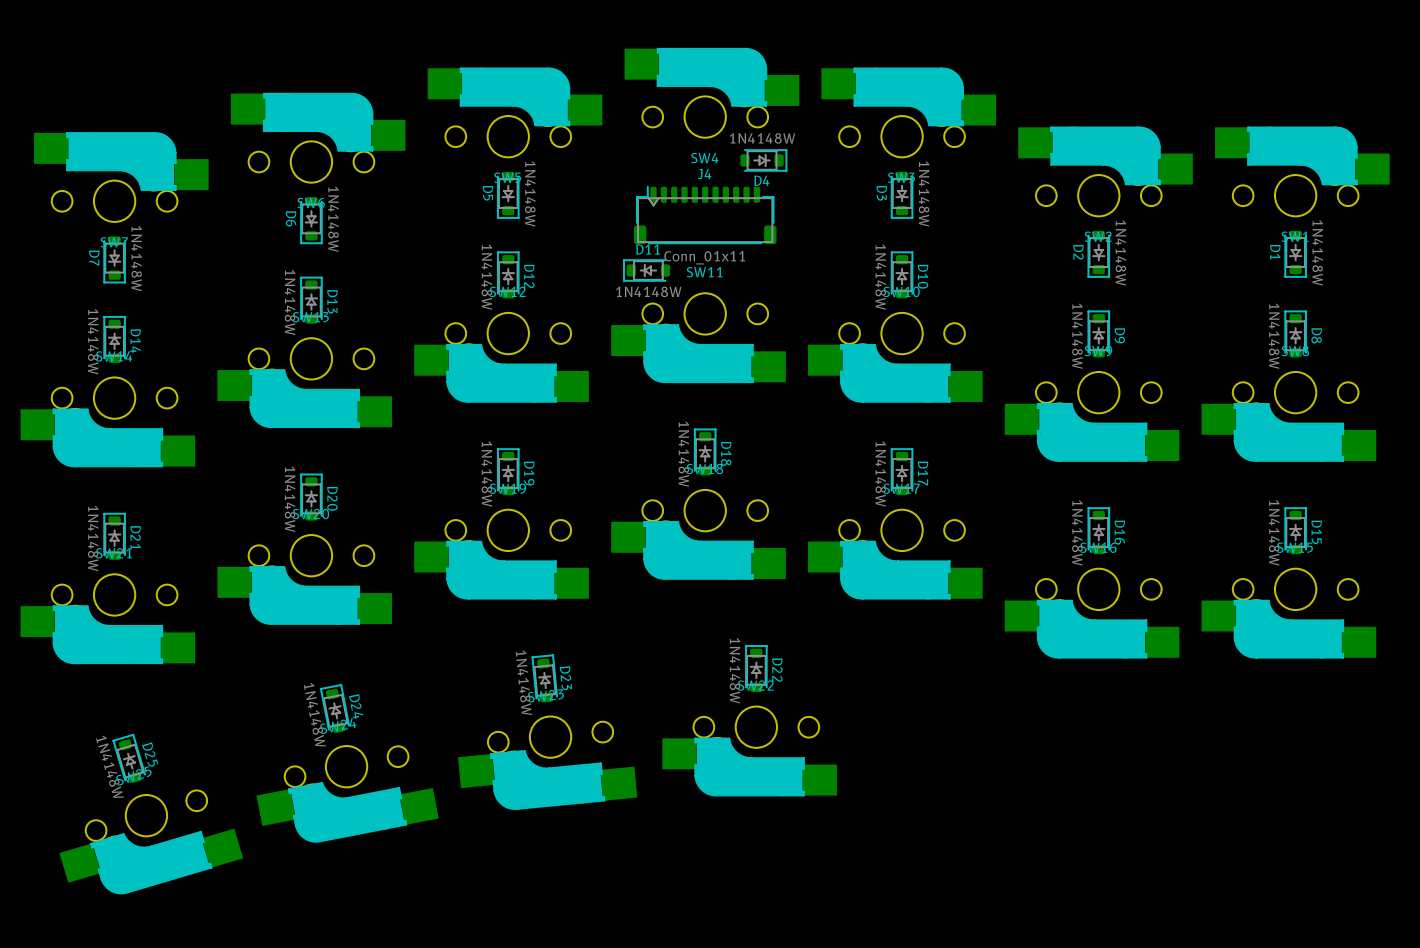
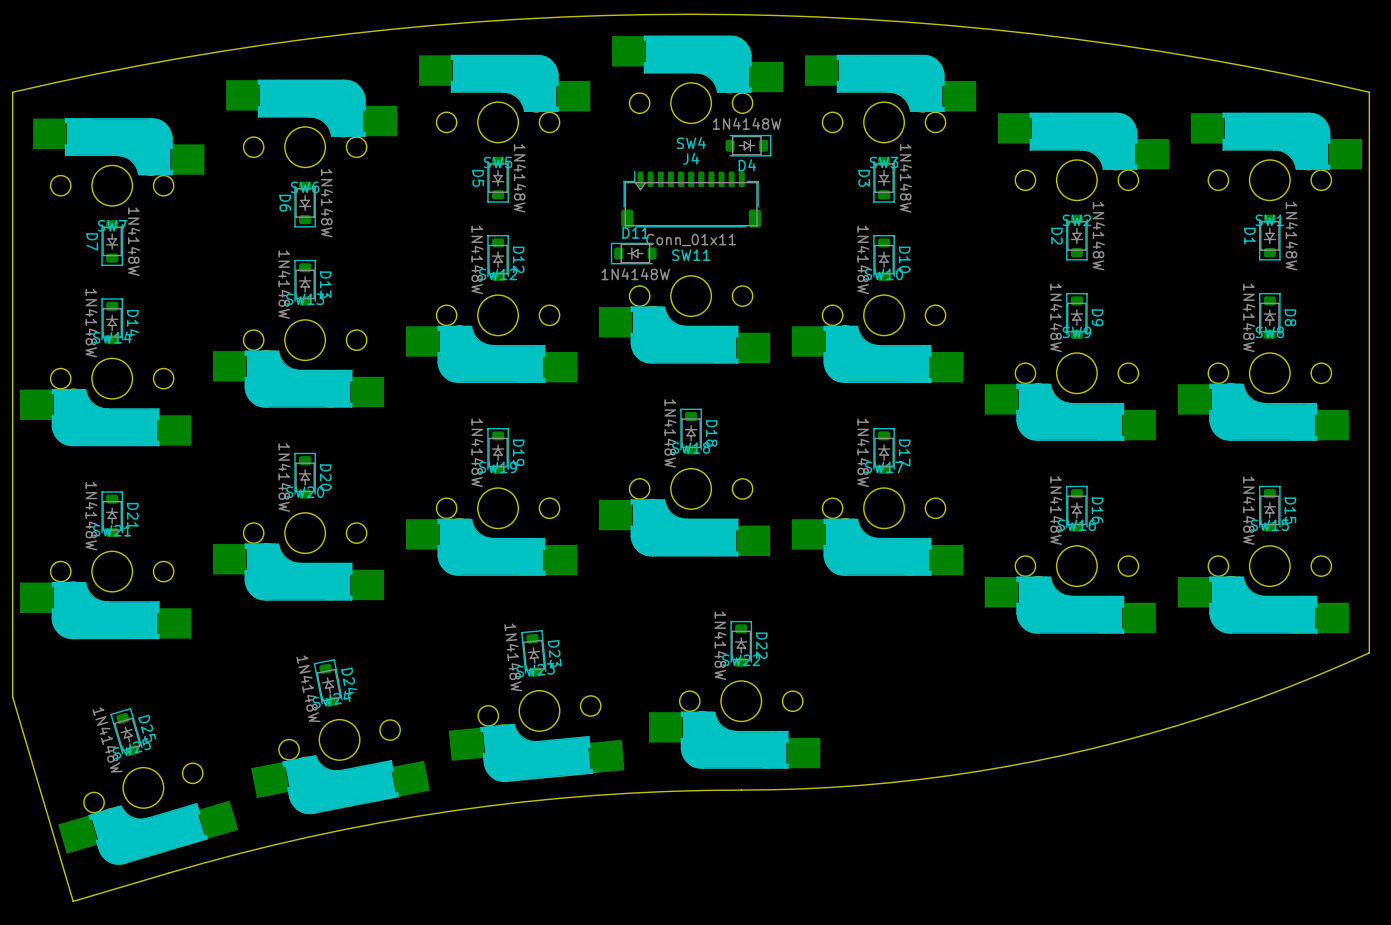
board edge: none -> (12, 92) (180, 58) (349, 33) (520, 19) (691, 14) (861, 19) (1032, 33) (1201, 58) (1369, 92) (1369, 652) (1288, 687) (1204, 716) (1120, 741) (1034, 761) (946, 775) (859, 785) (632, 793) (560, 798) (451, 811) (380, 822) (273, 845) (203, 863) (73, 901) (12, 697) (12, 92)

